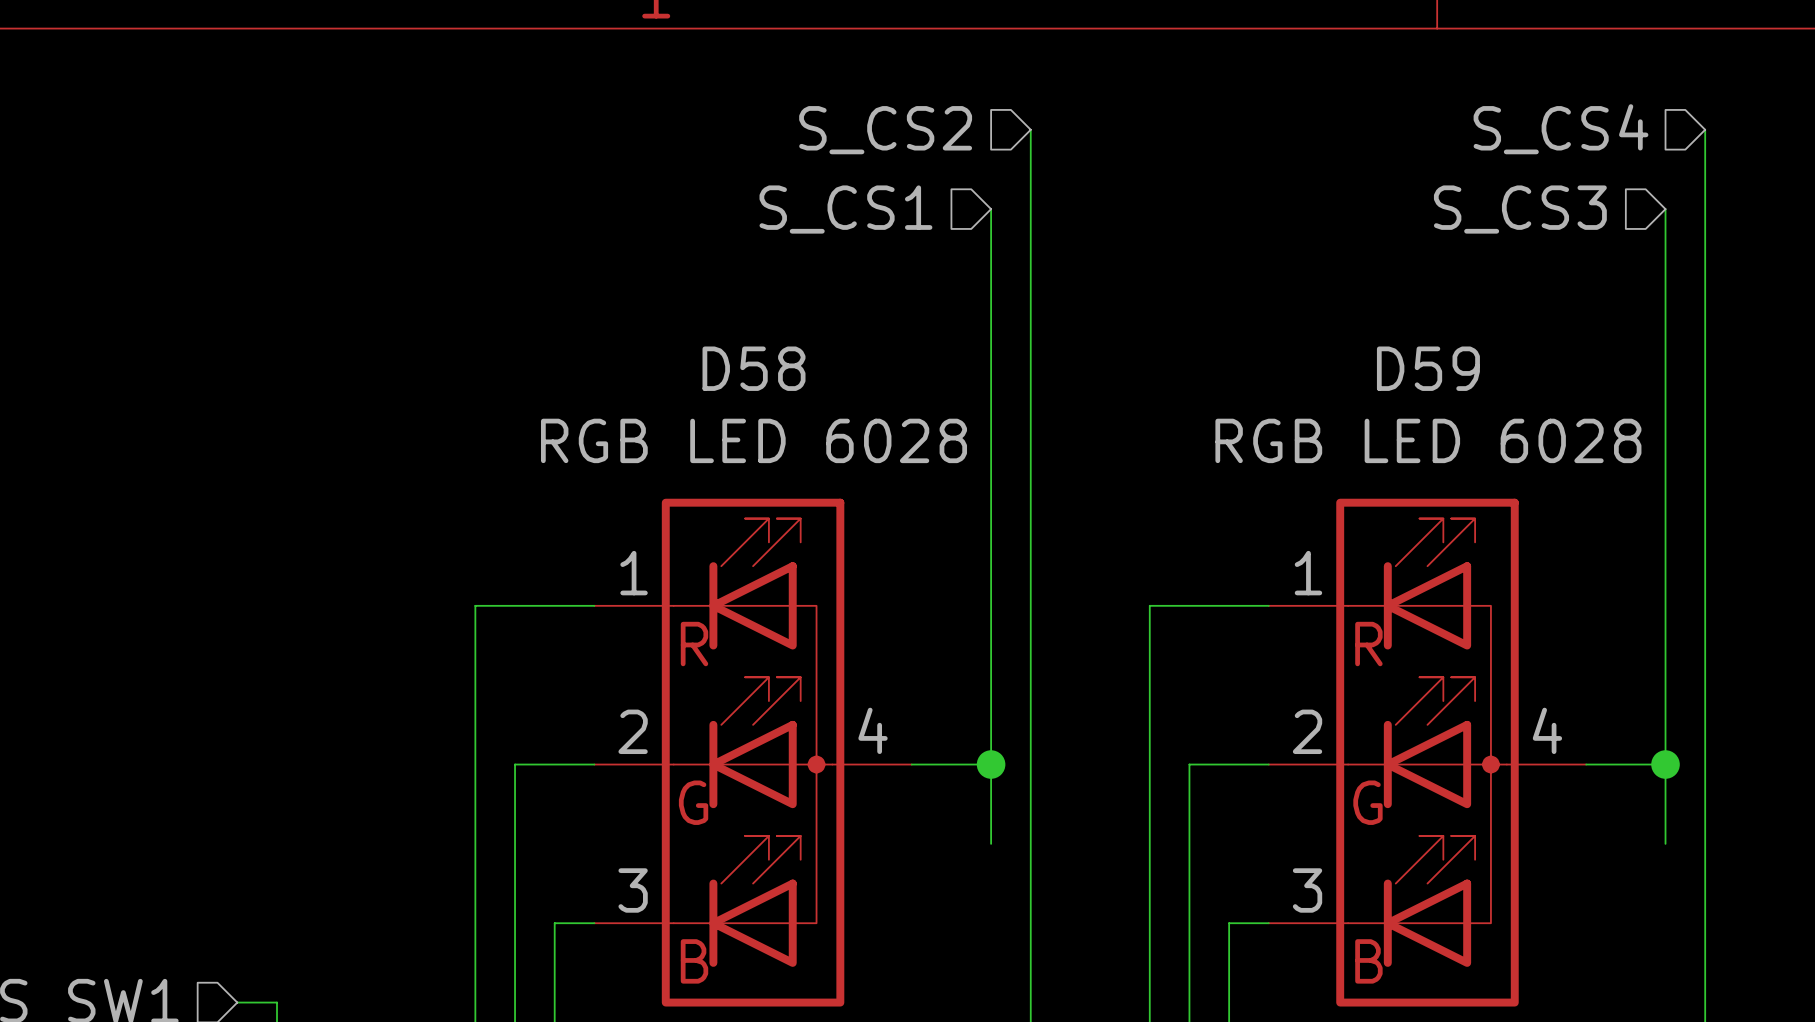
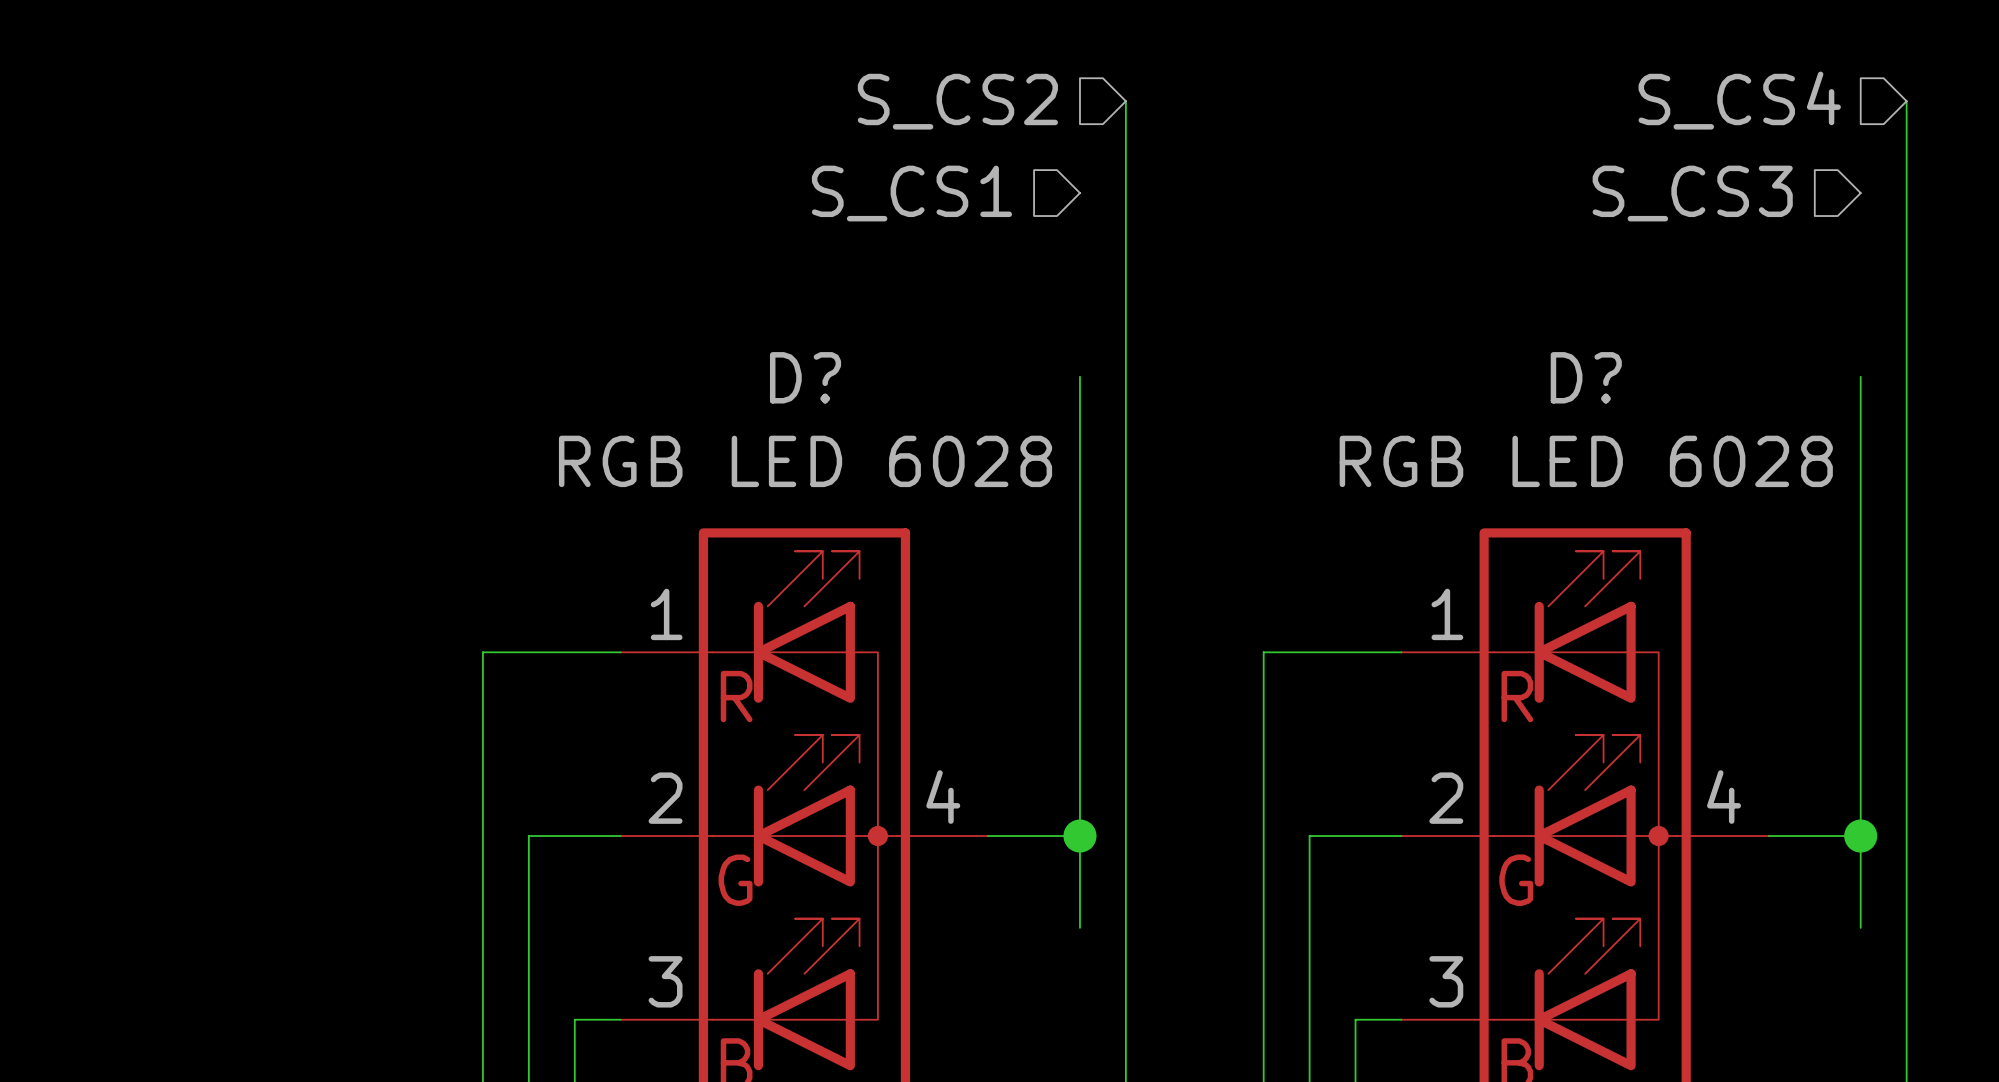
wire: (991, 209) (991, 367) -> none
wire: (1665, 209) (1665, 367) -> none
D58 name: D58 (754, 368) -> D? (805, 377)
D59 name: D59 (1428, 368) -> D? (1586, 377)

